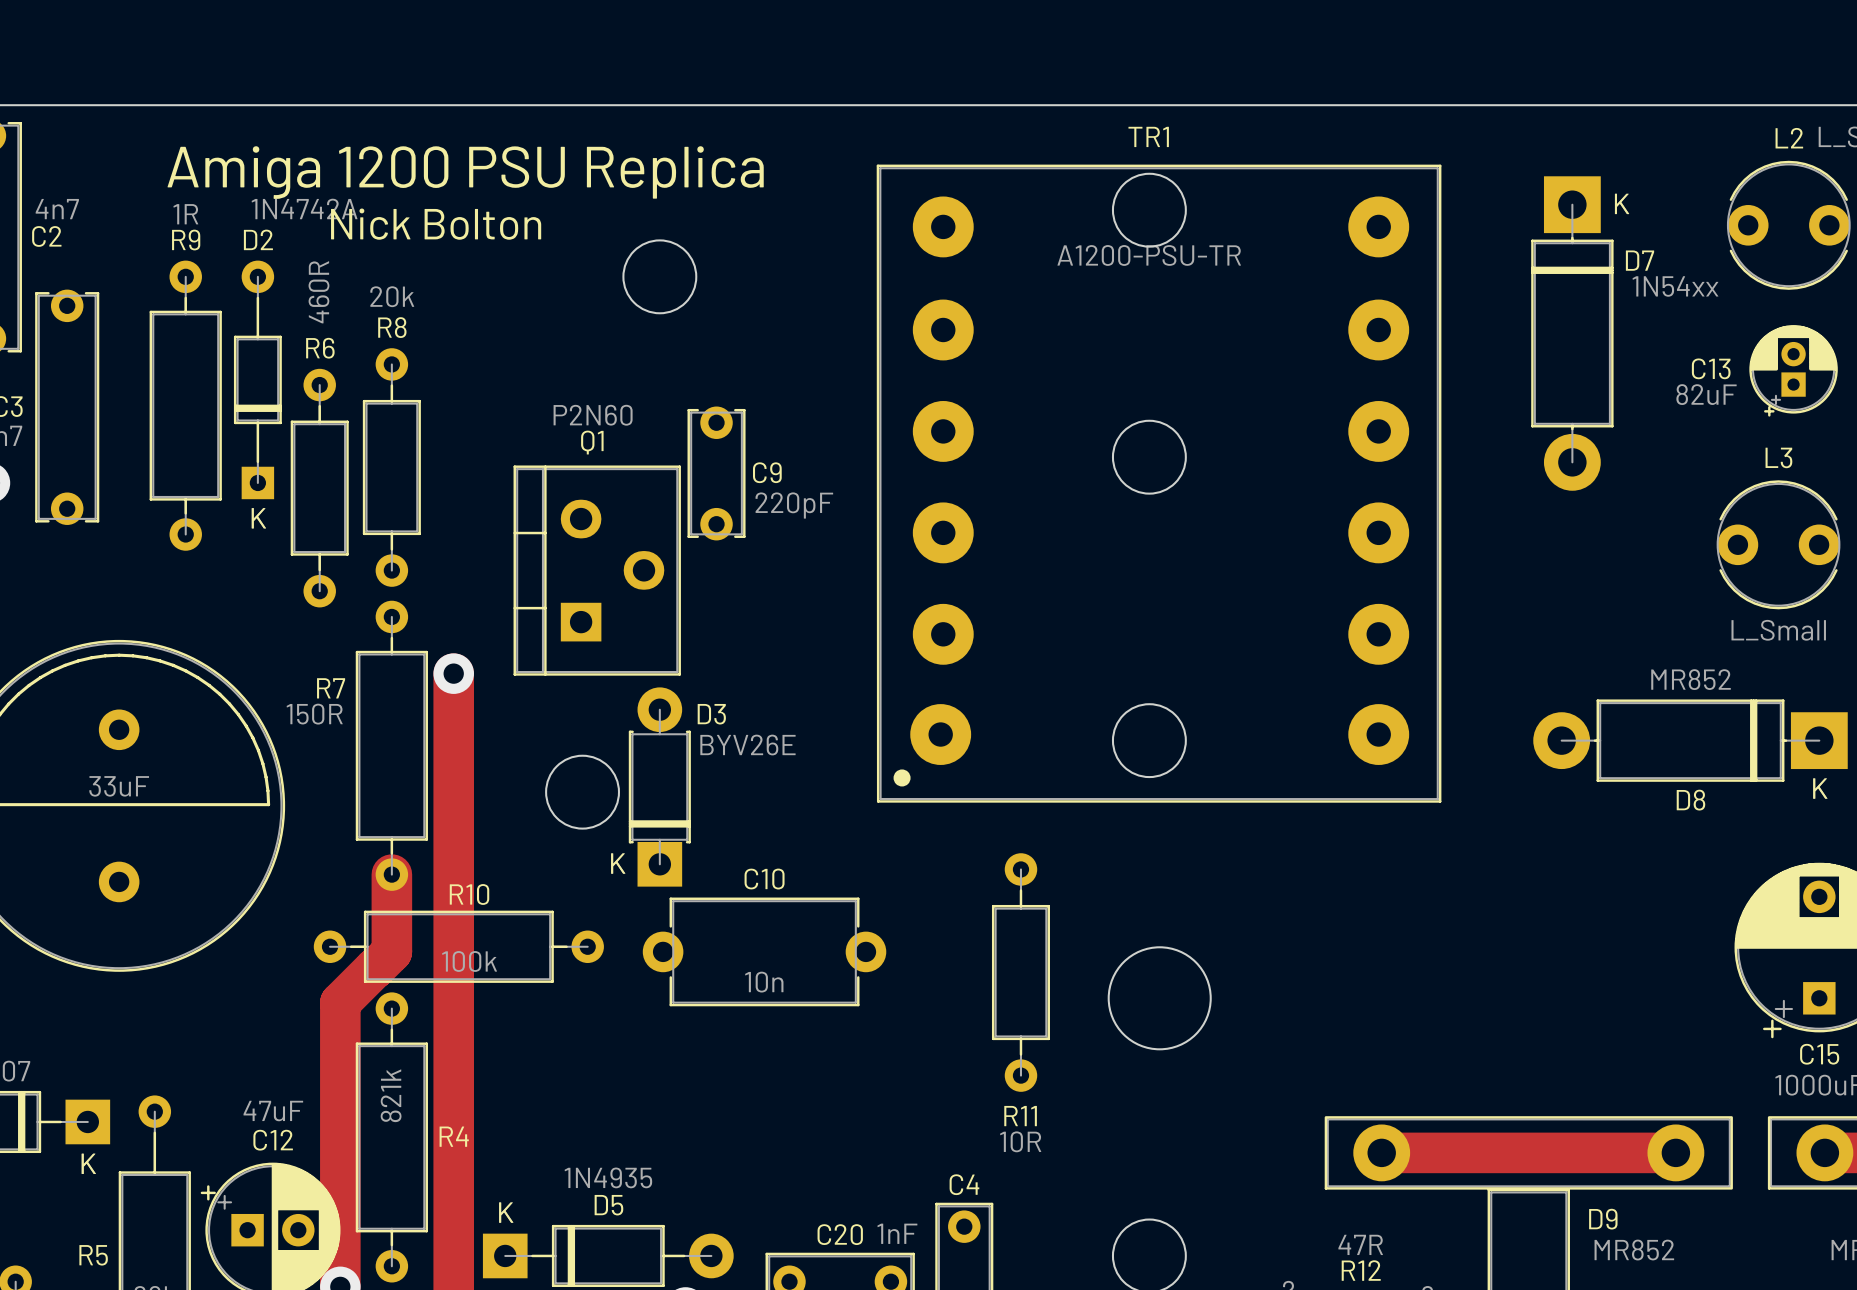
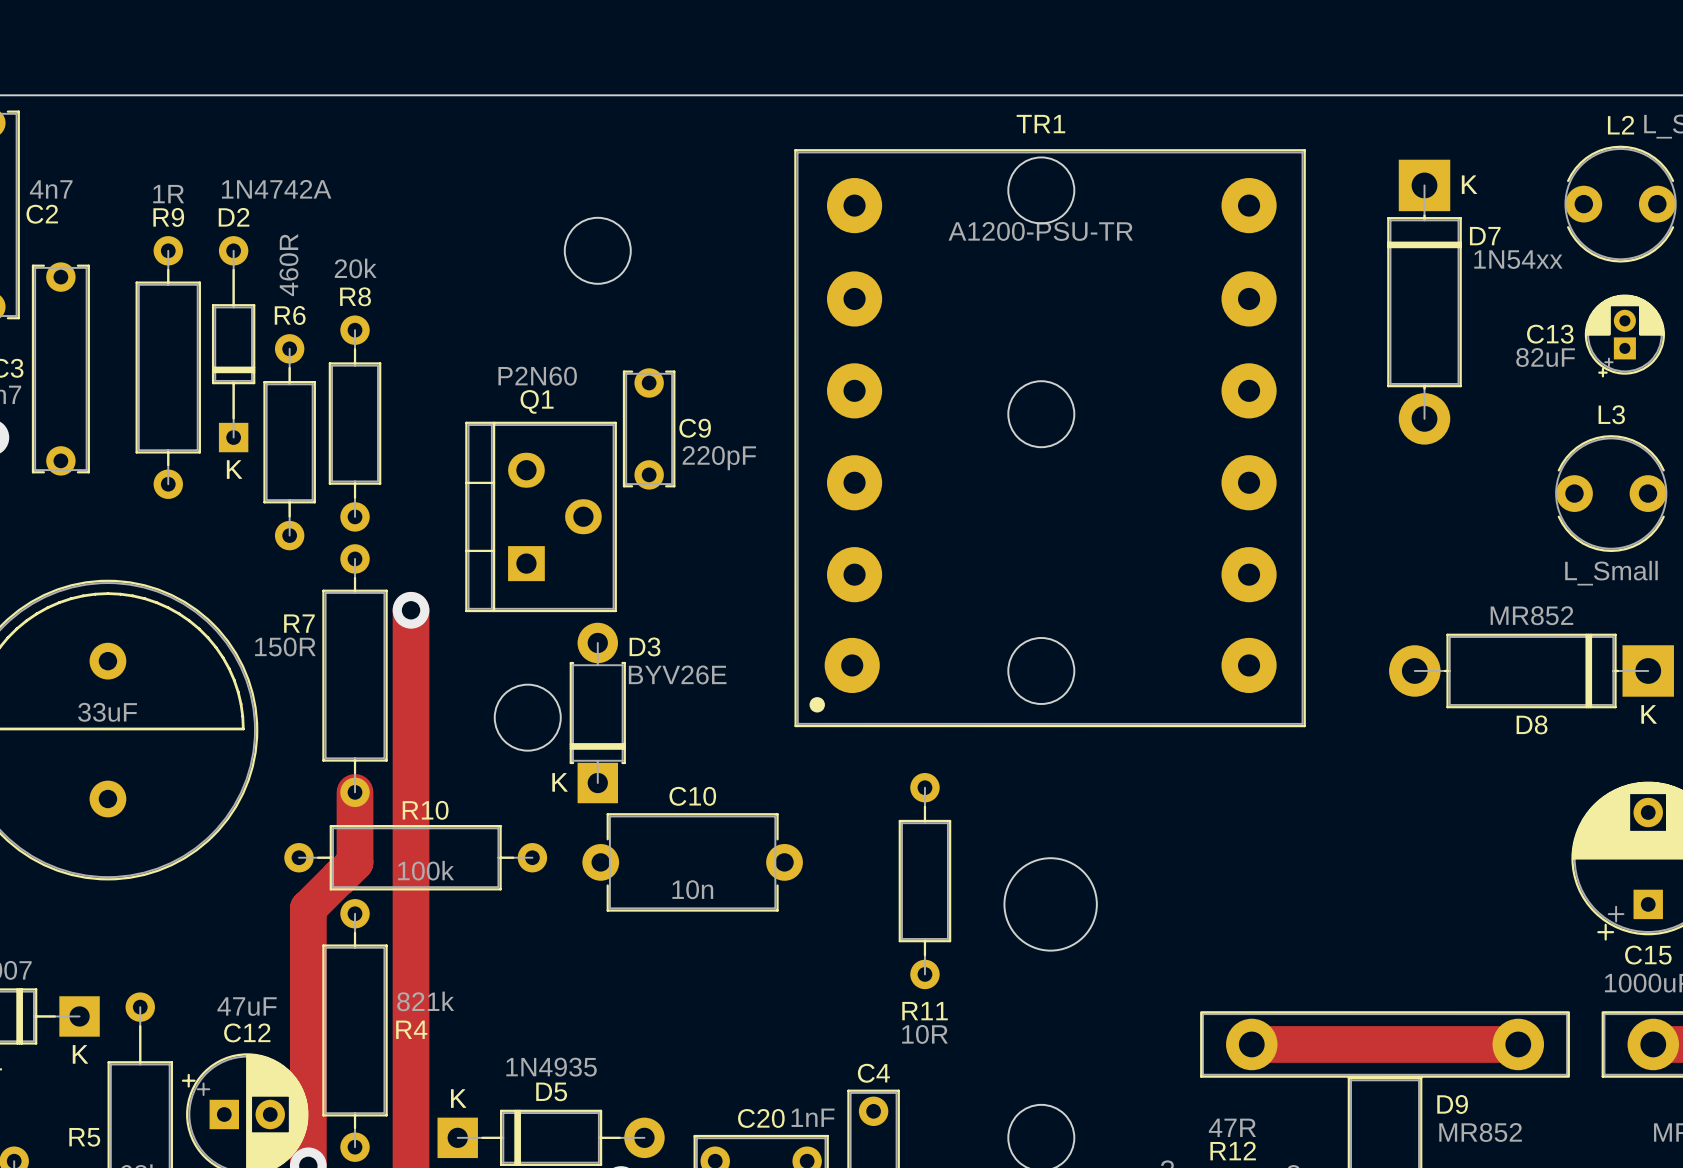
text: Amiga 1200 PSU Replica (465, 172) -> none
text: Nick Bolton (436, 224) -> none
R4 value rotation: 0° (391, 1095) -> 90° clockwise (425, 1001)

